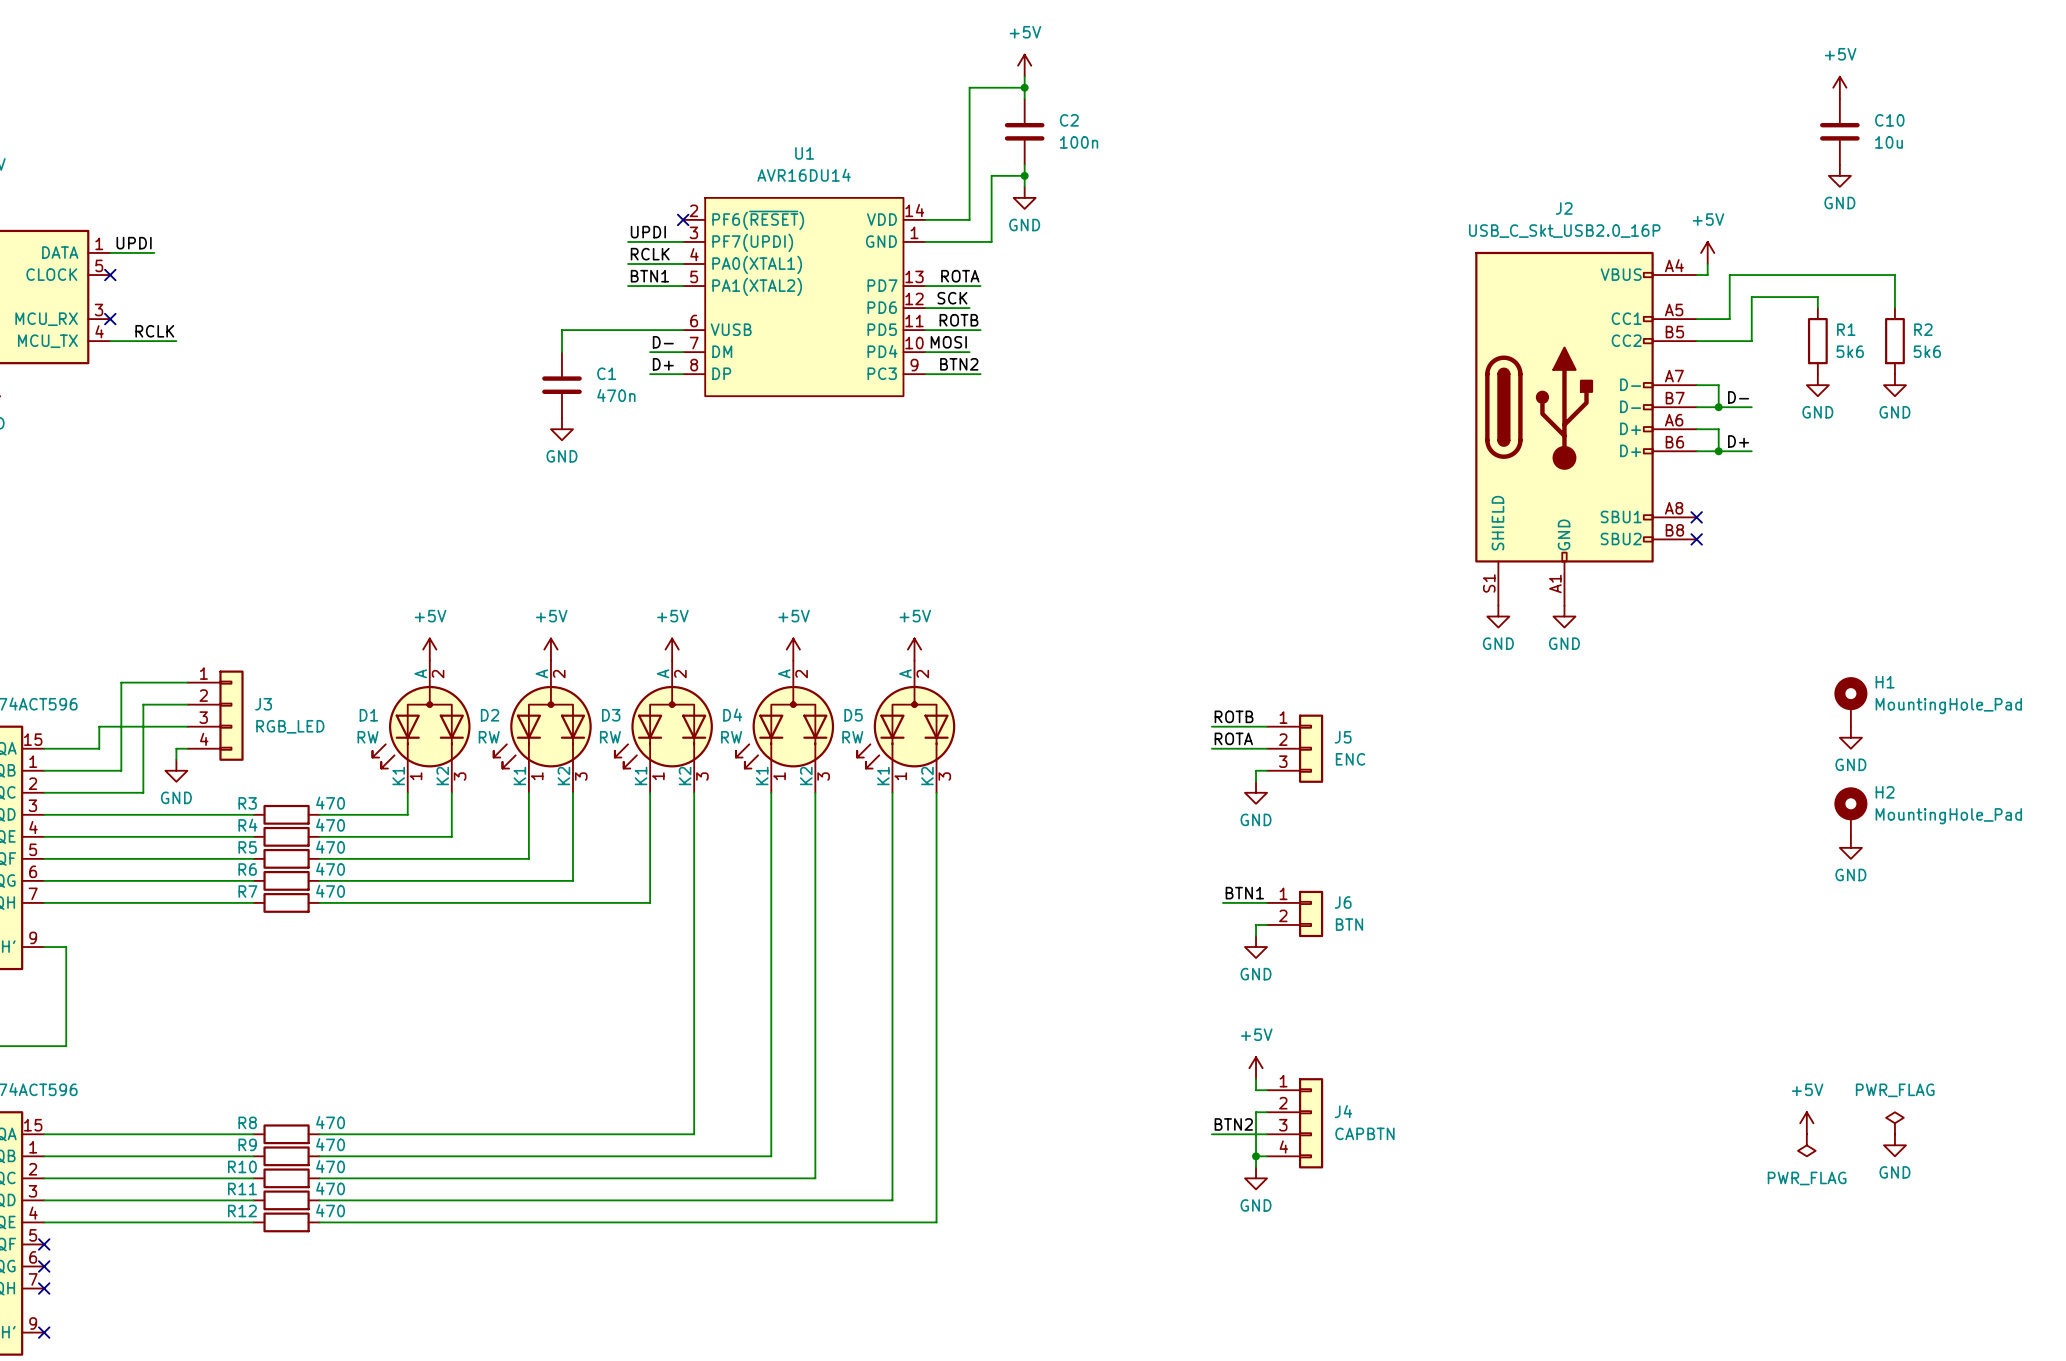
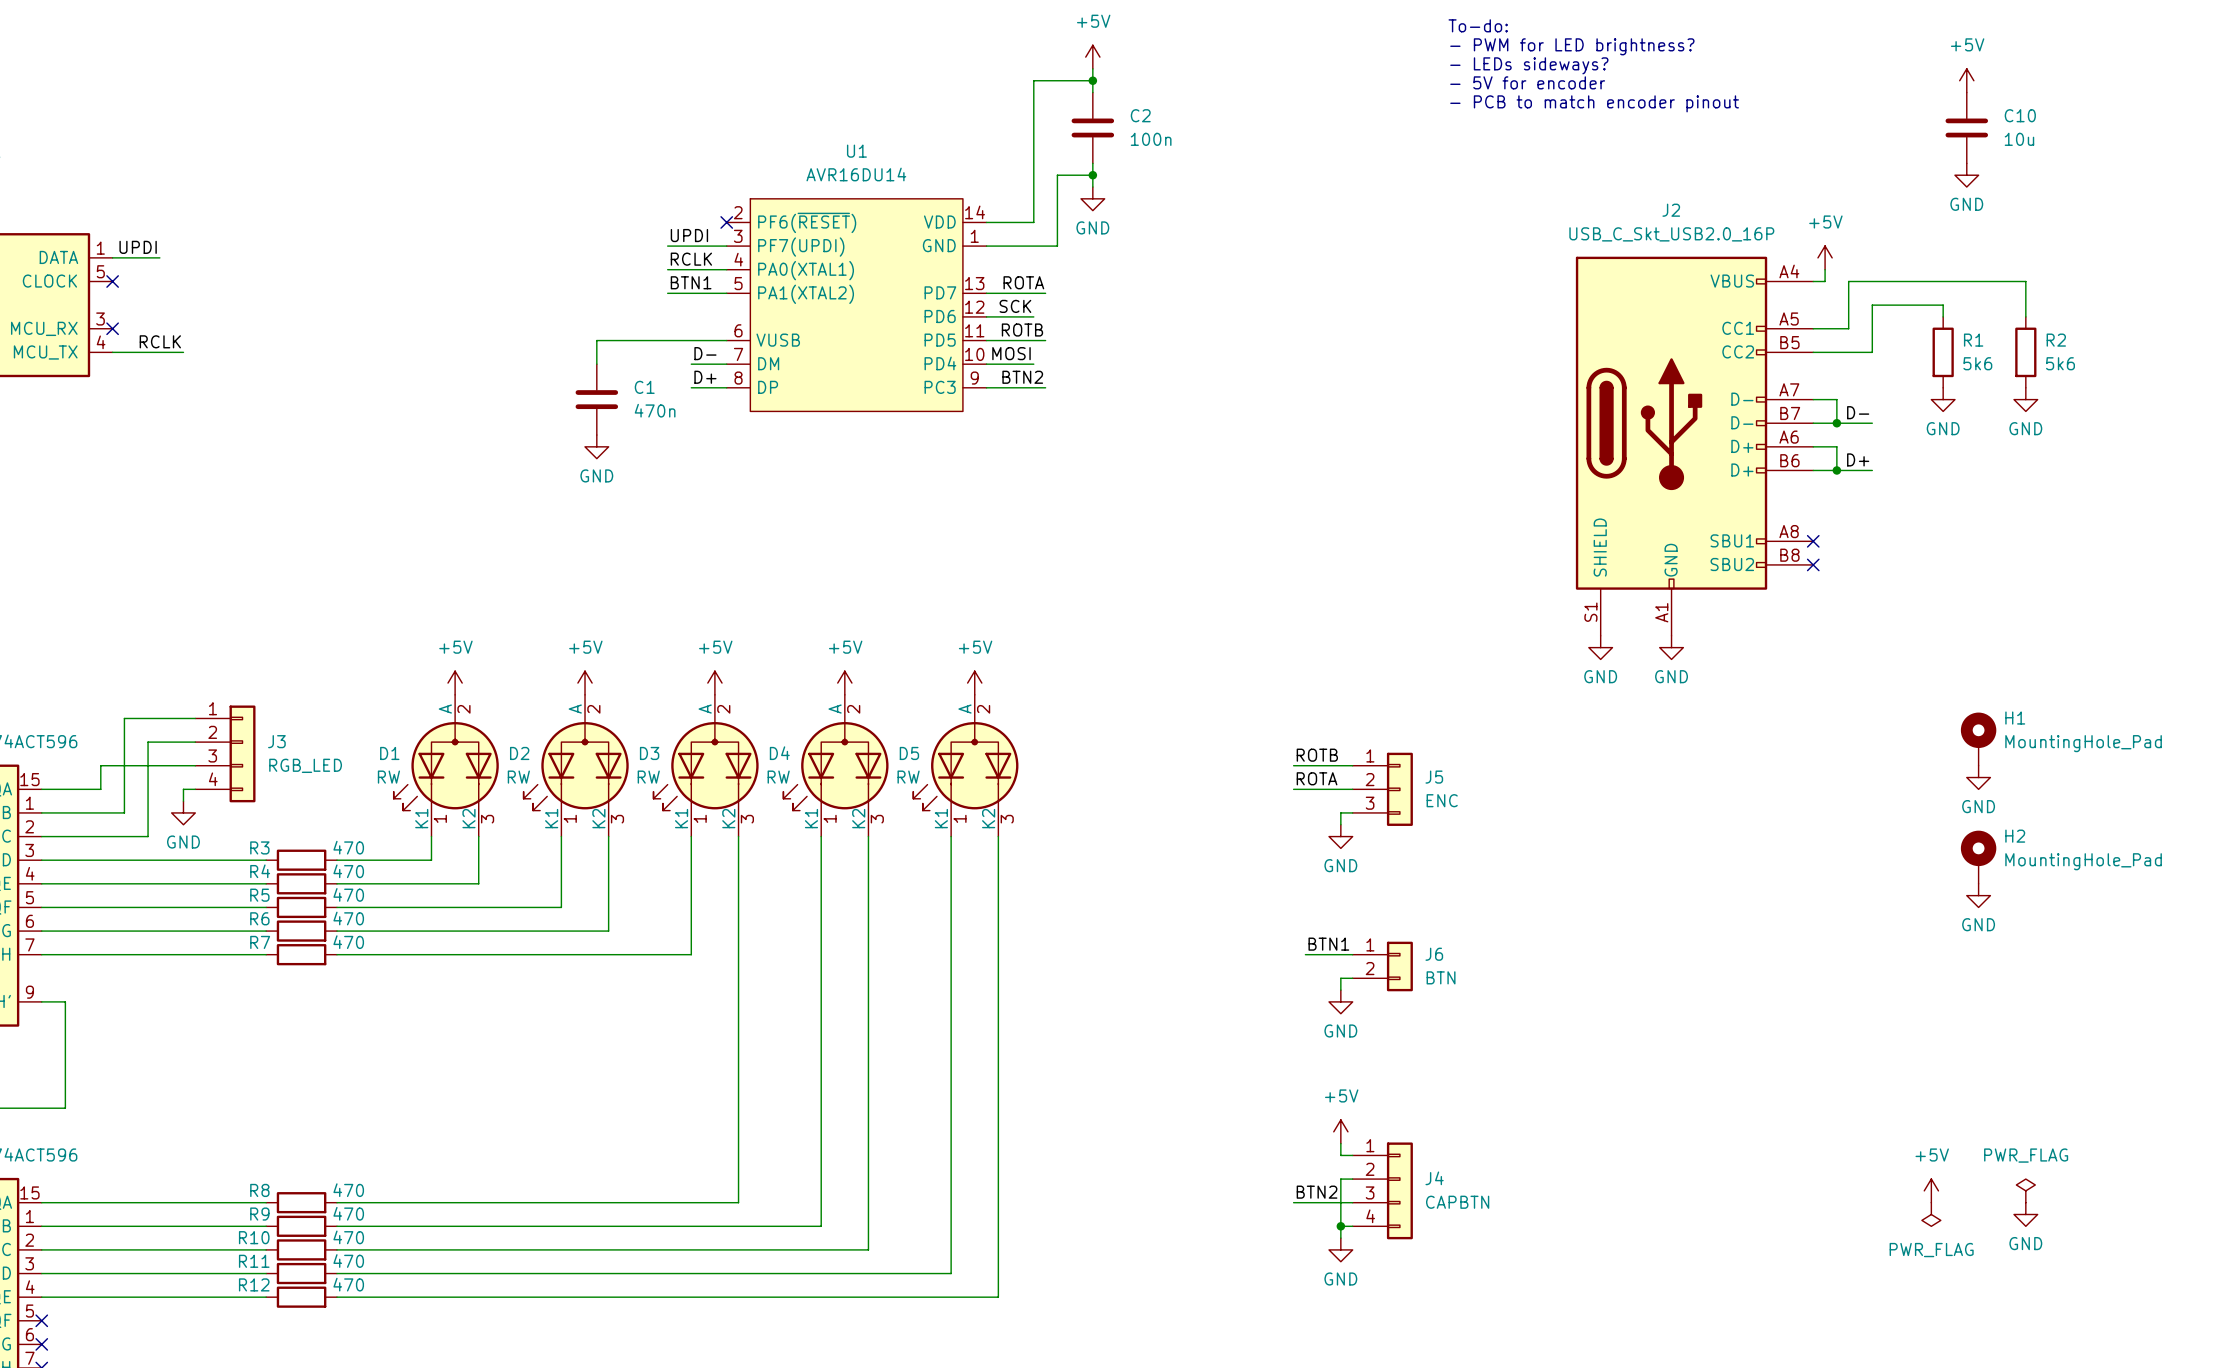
text: none -> To-do: (1478, 25)
text: none -> - PWM for LED brightness? (1572, 46)
text: none -> - LEDs sideways? (1529, 65)
text: none -> - 5V for encoder (1527, 82)
text: none -> - PCB to match encoder pinout (1594, 103)

